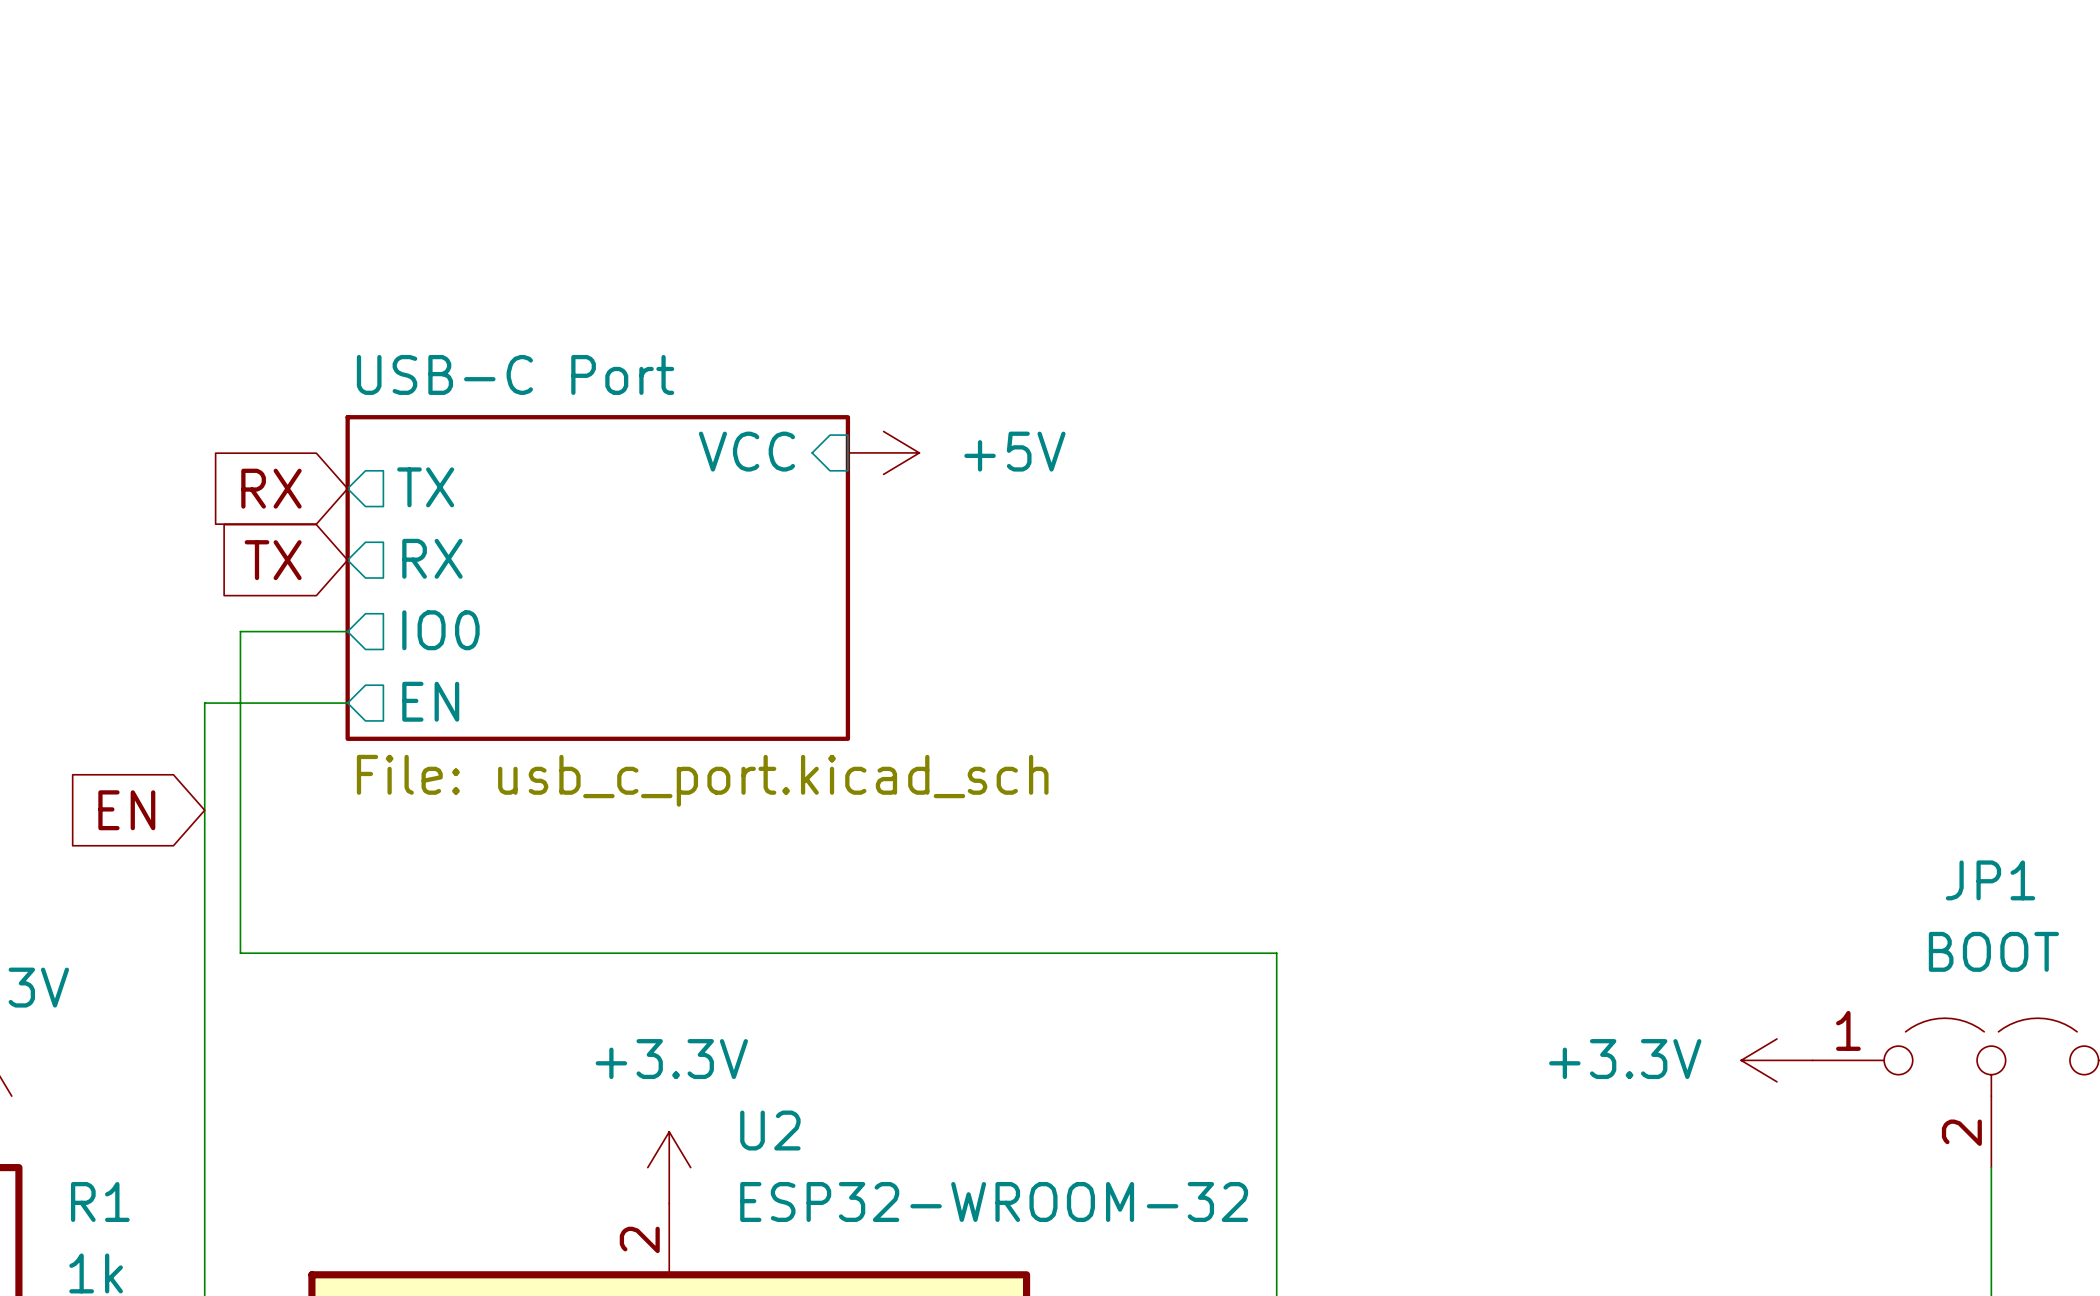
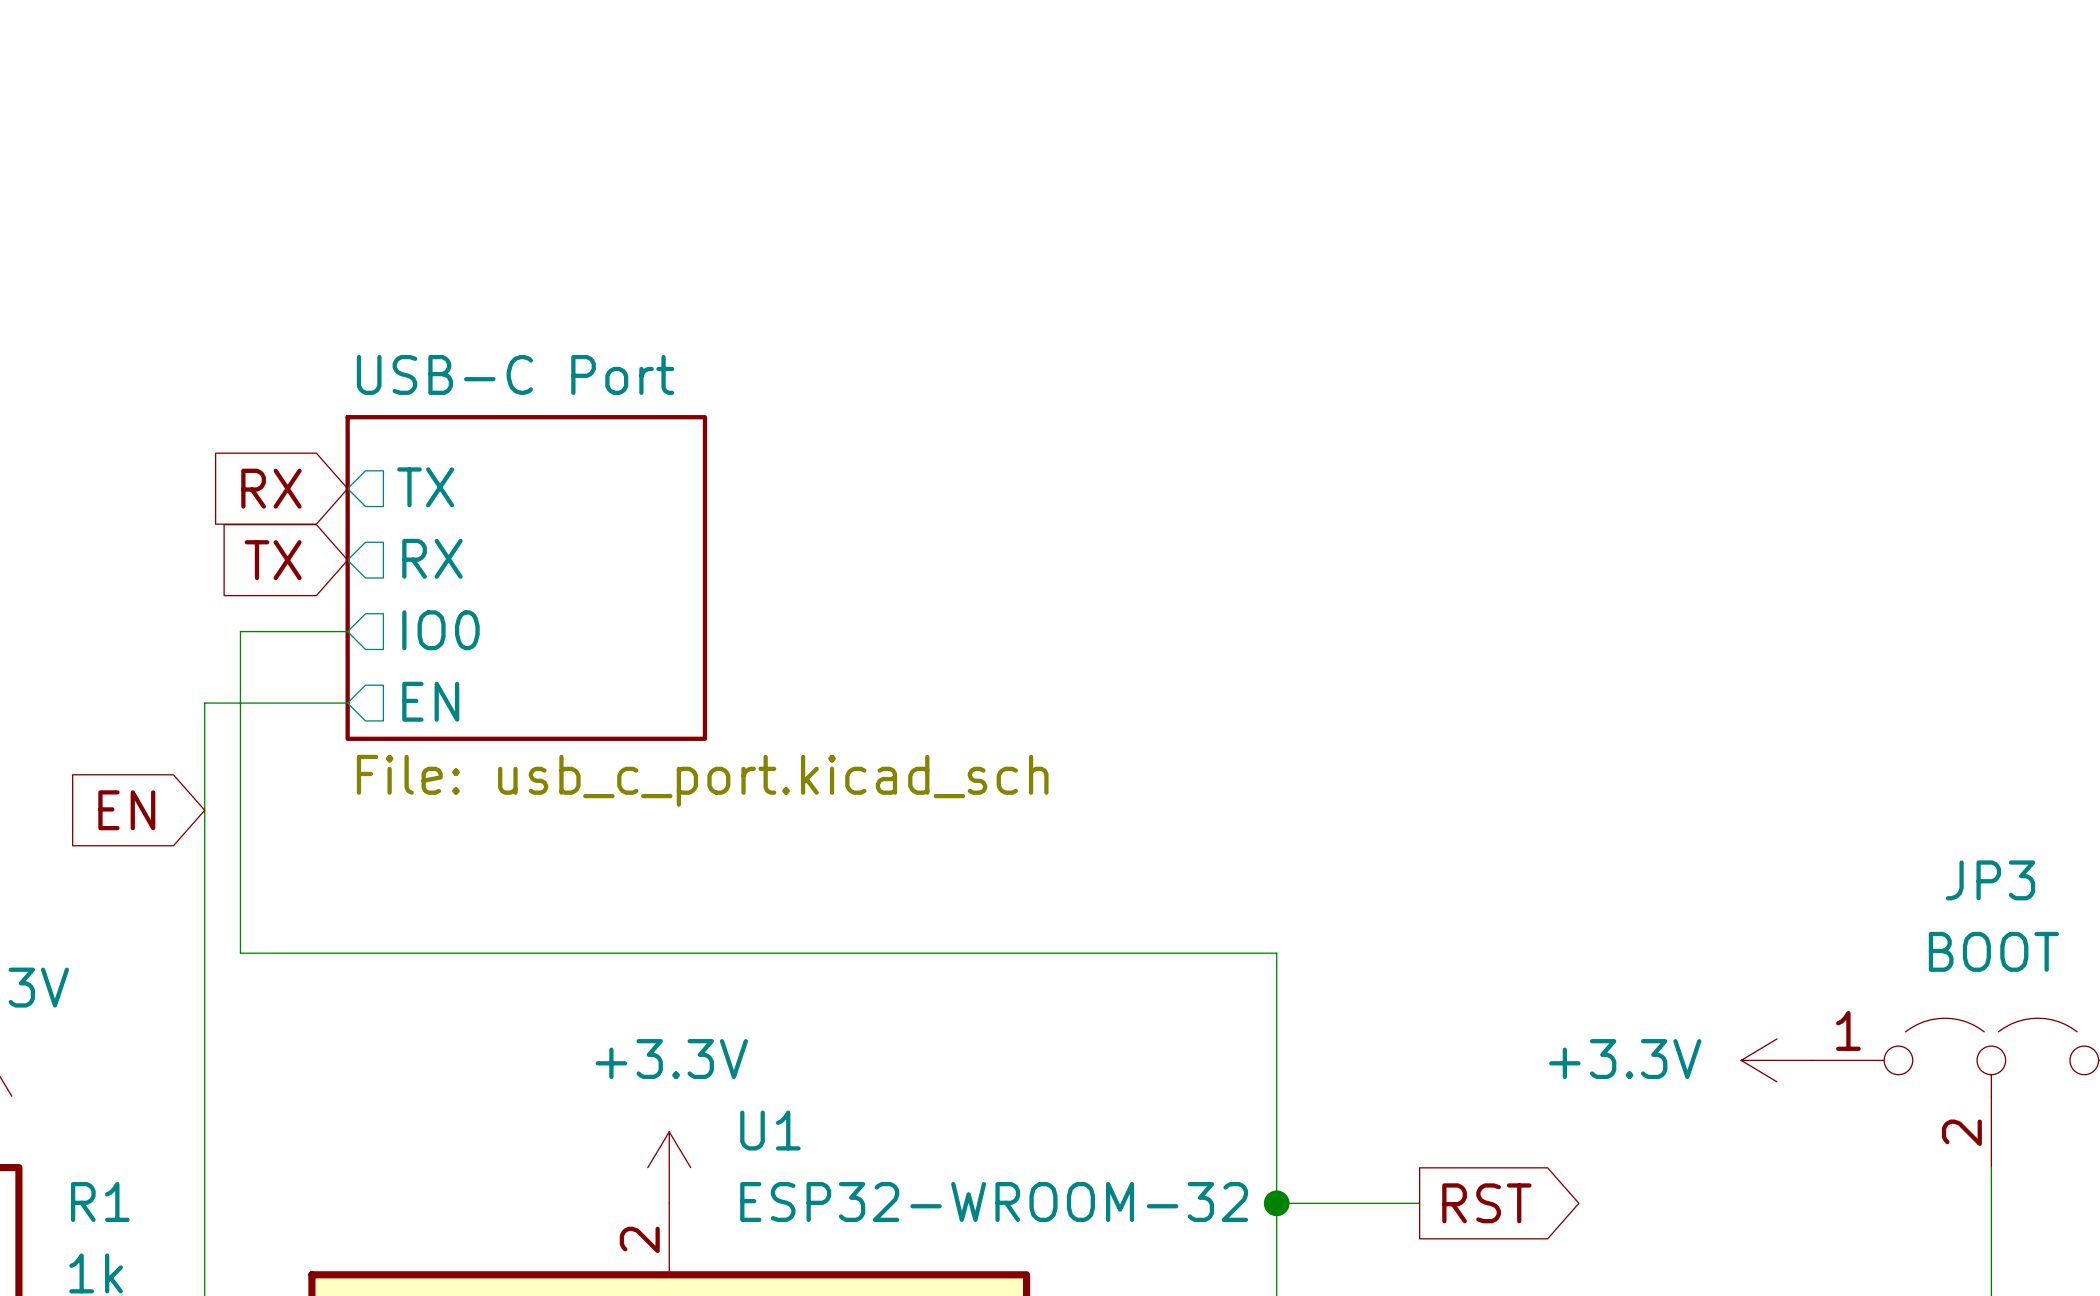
sheet pin: VCC (746, 451) -> none
power symbol: +5V (883, 452) -> none
sheet USB-C Port: none -> File: usb_c_port.kicad_sch (526, 578)
sheet USB-C Port: File: usb_c_port.kicad_sch (597, 578) -> none
JP1 name: JP1 (1990, 880) -> JP3 (1990, 880)
U2 name: U2 (770, 1130) -> U1 (770, 1130)
wire: none -> (1276, 1203) (1419, 1203)
junction: none -> (1276, 1203)
global label: none -> RST (1486, 1203)

